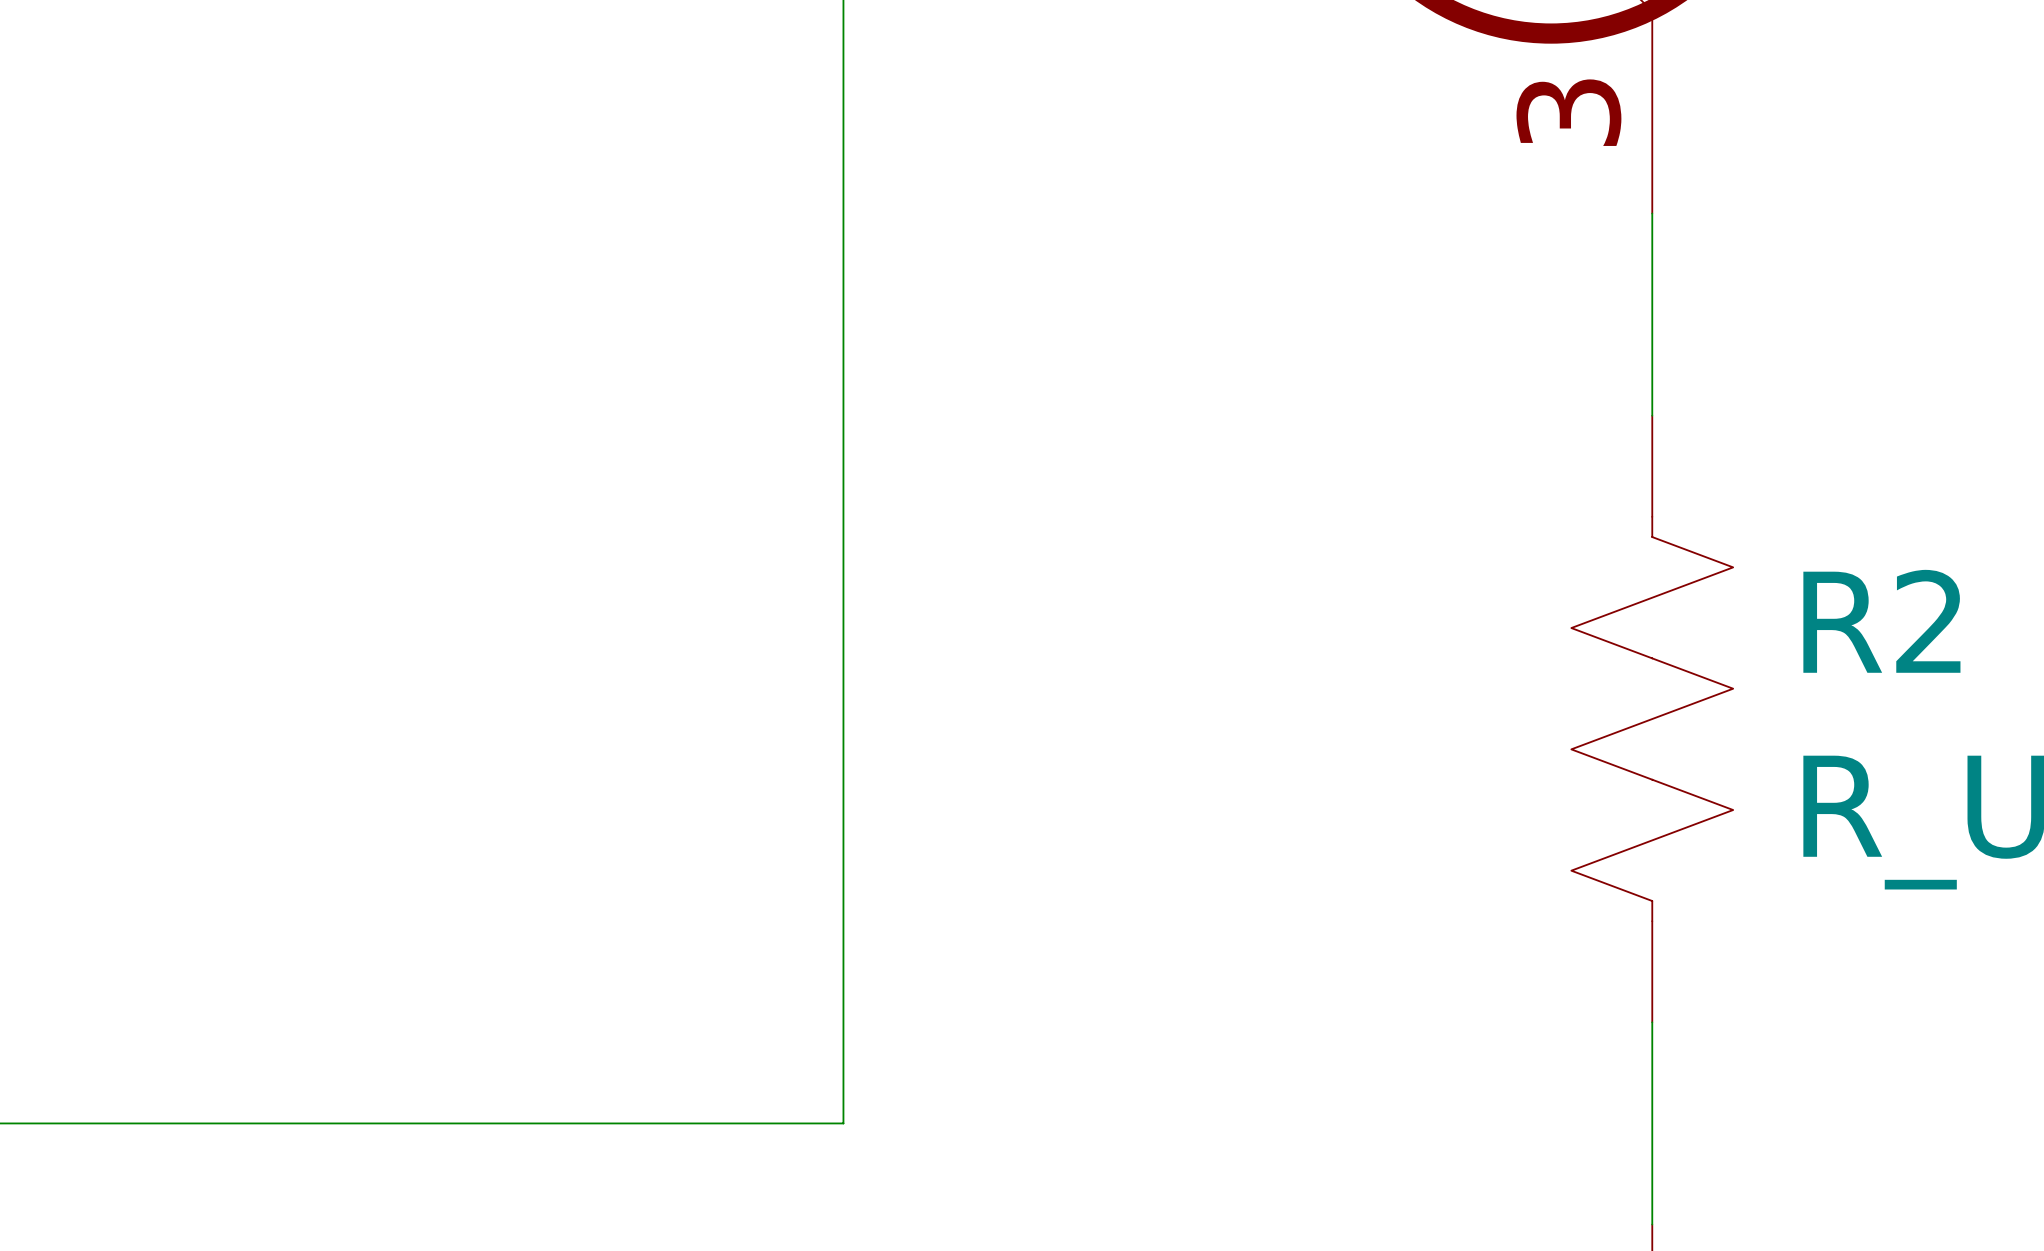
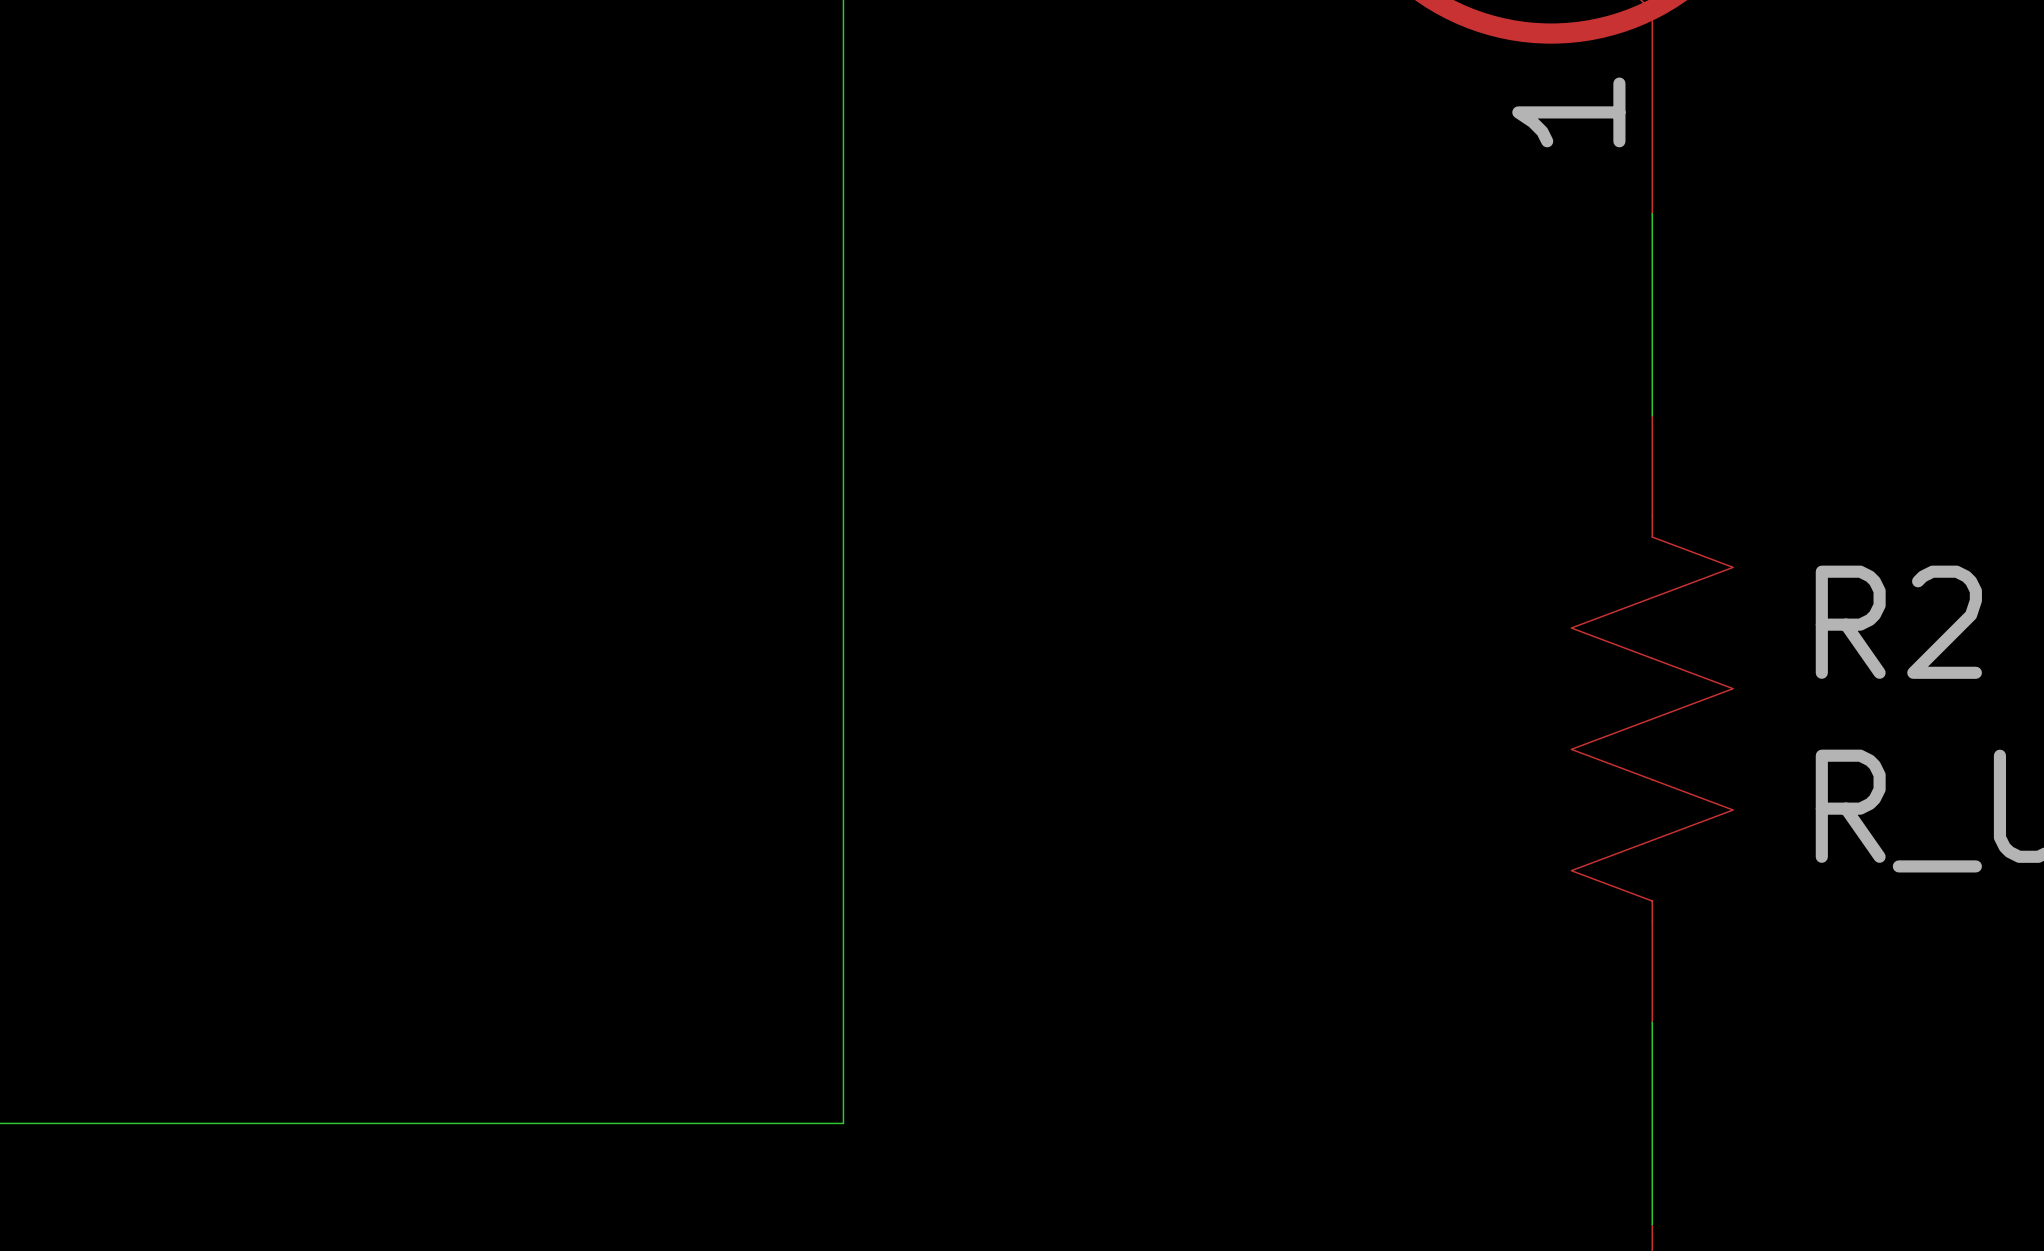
part pin number: 3 (1568, 112) -> 1 (1568, 112)

